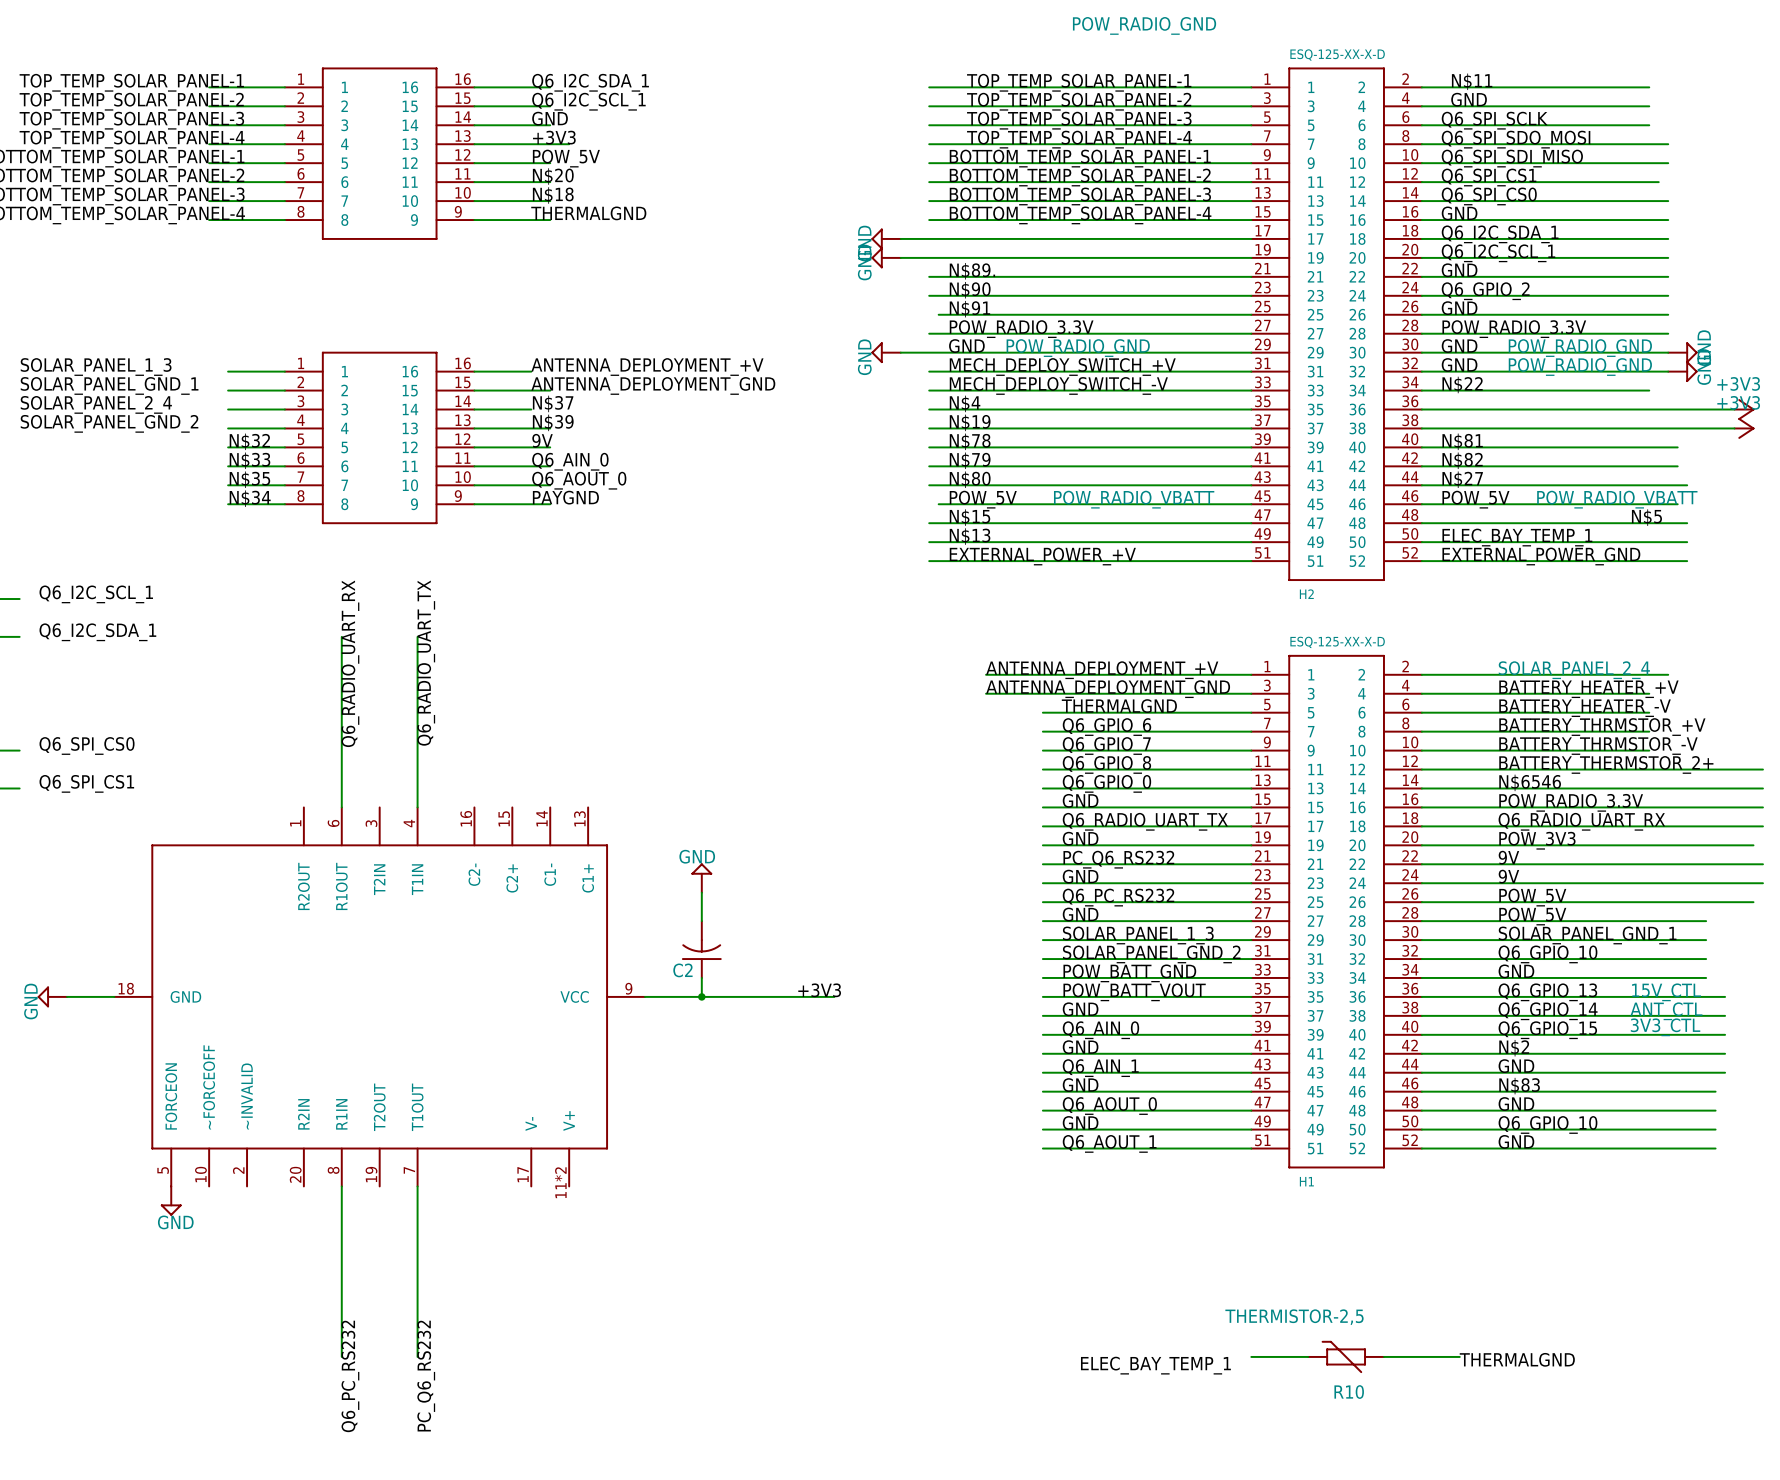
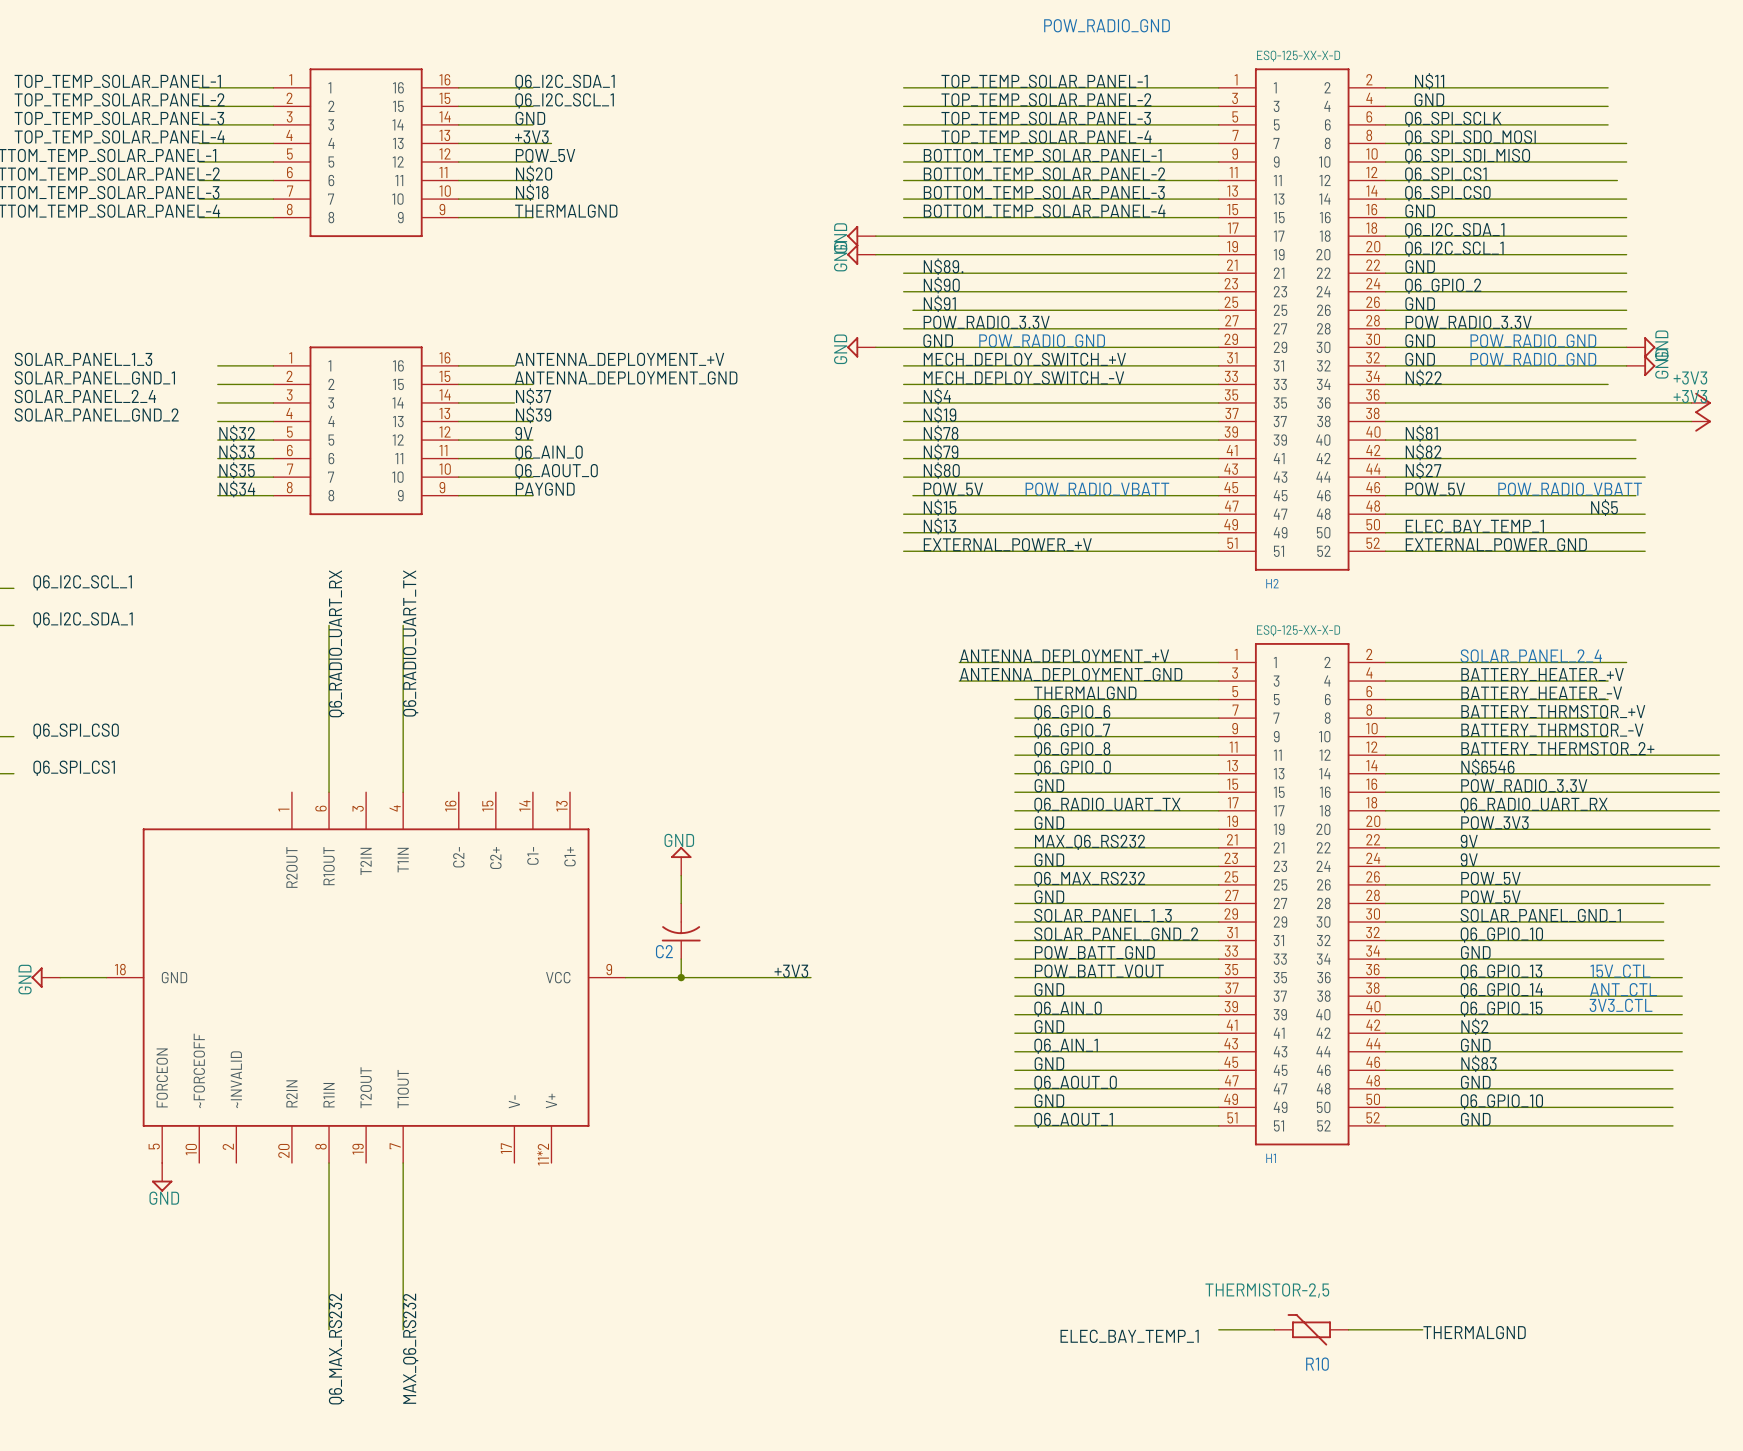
label: PC_Q6_RS232 (1118, 859) -> MAX_Q6_RS232 (1090, 842)
label: Q6_PC_RS232 (1118, 897) -> Q6_MAX_RS232 (1089, 879)
label: Q6_PC_RS232 (350, 1376) -> Q6_MAX_RS232 (336, 1349)
label: PC_Q6_RS232 (426, 1376) -> MAX_Q6_RS232 (410, 1348)

